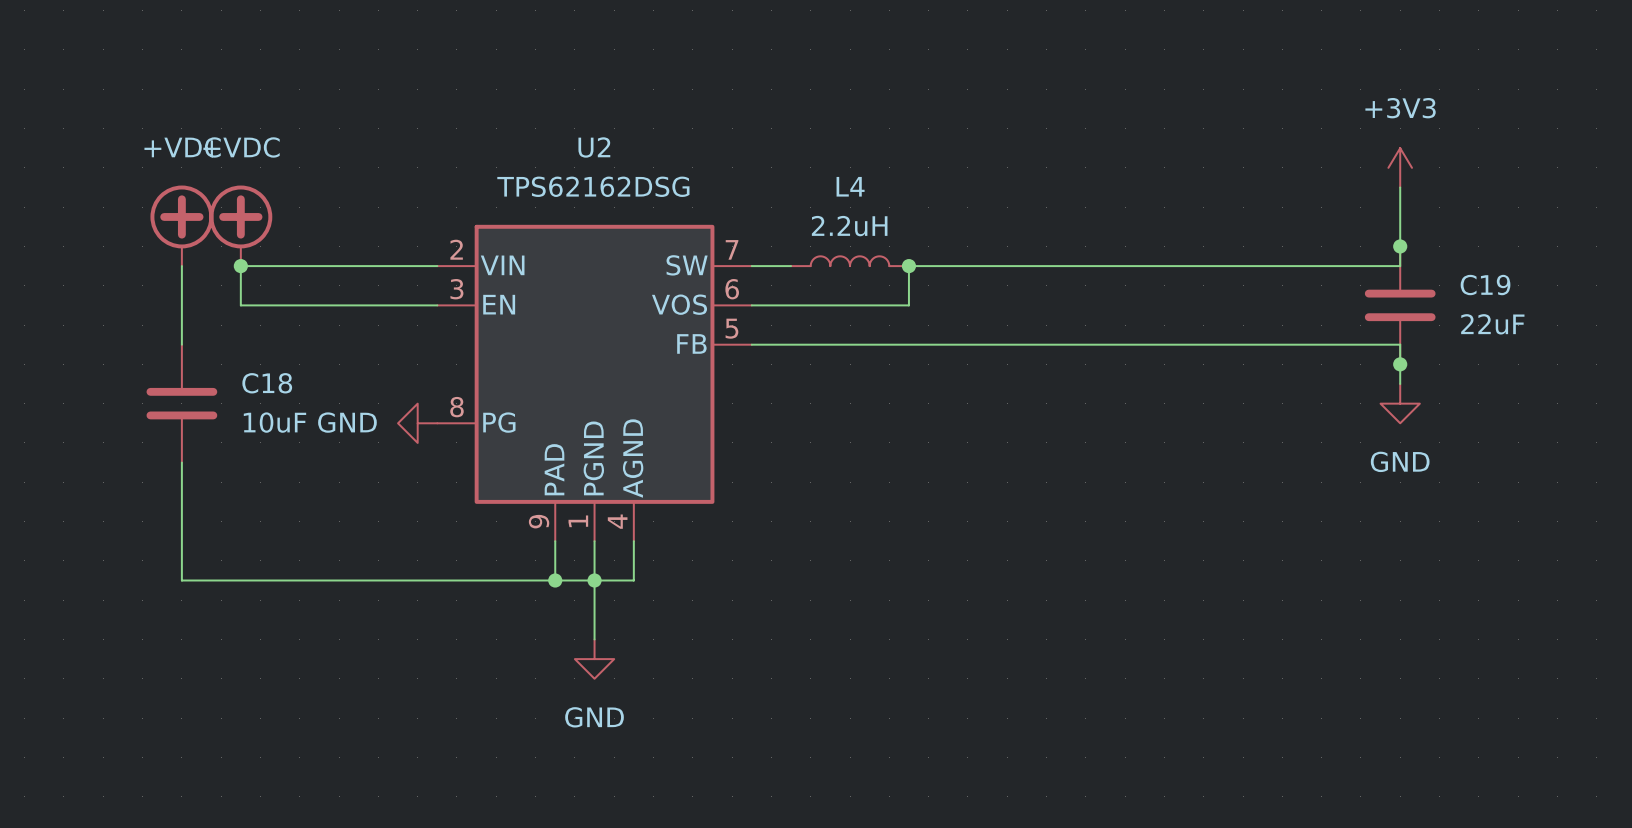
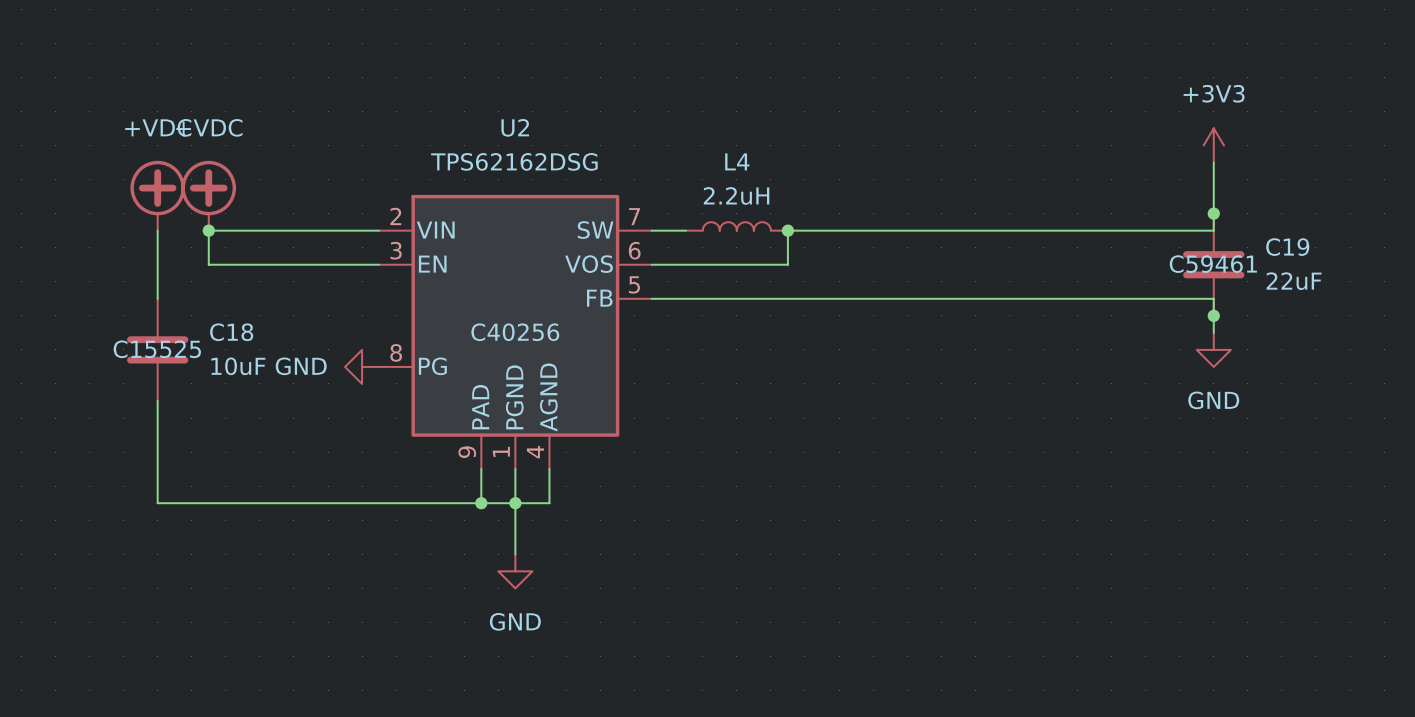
C19 text: none -> C59461 (1213, 264)
U2 text: none -> C40256 (515, 332)
C18 text: none -> C15525 (157, 349)

